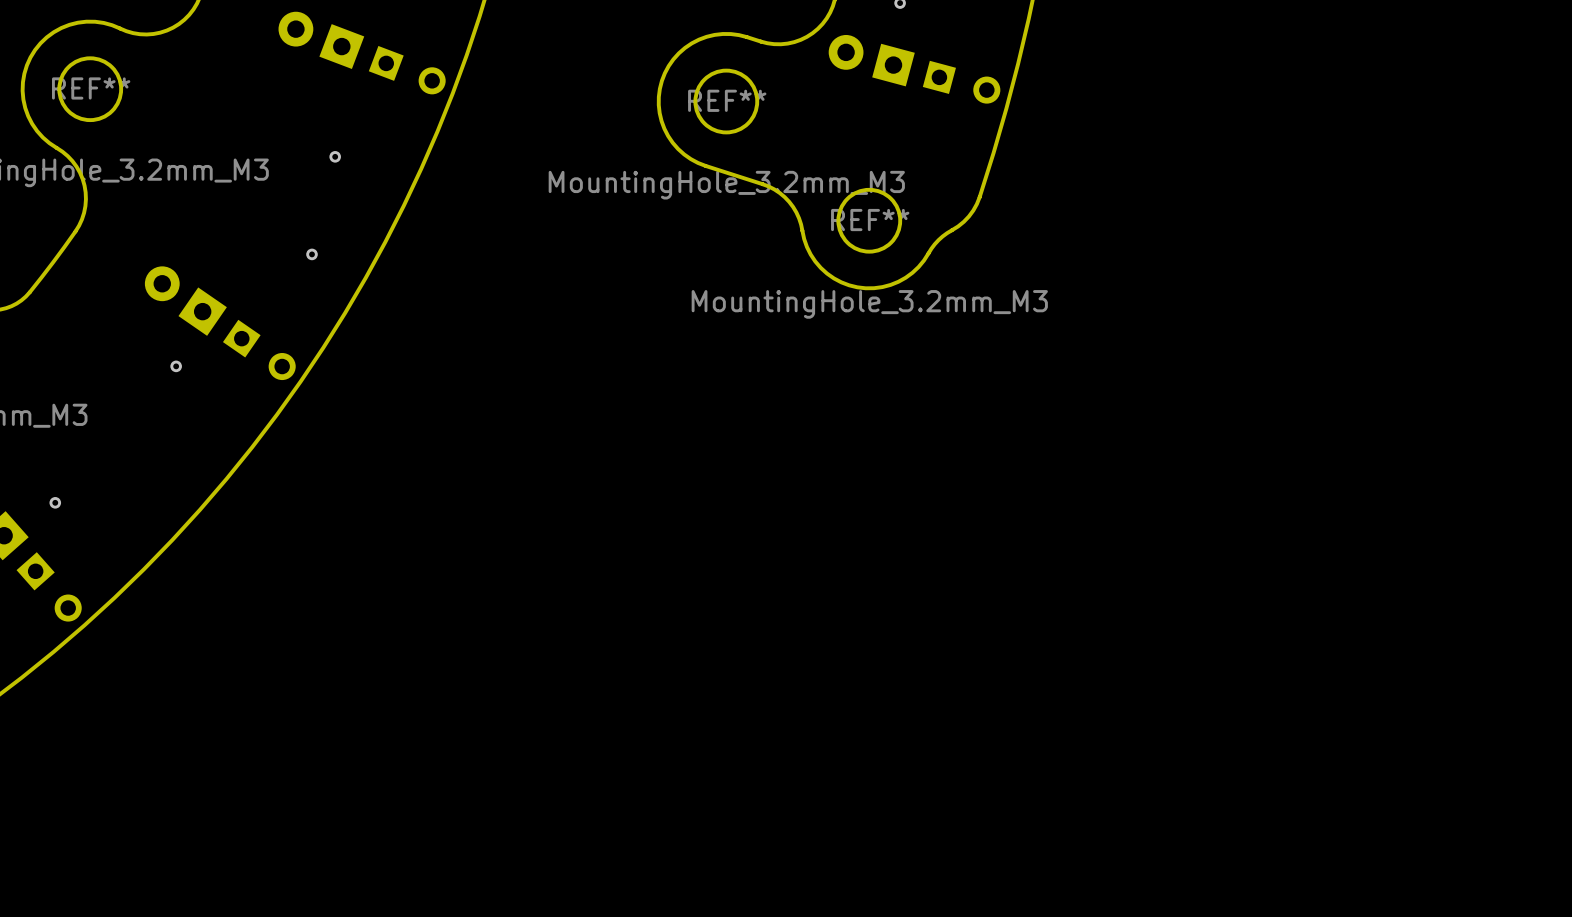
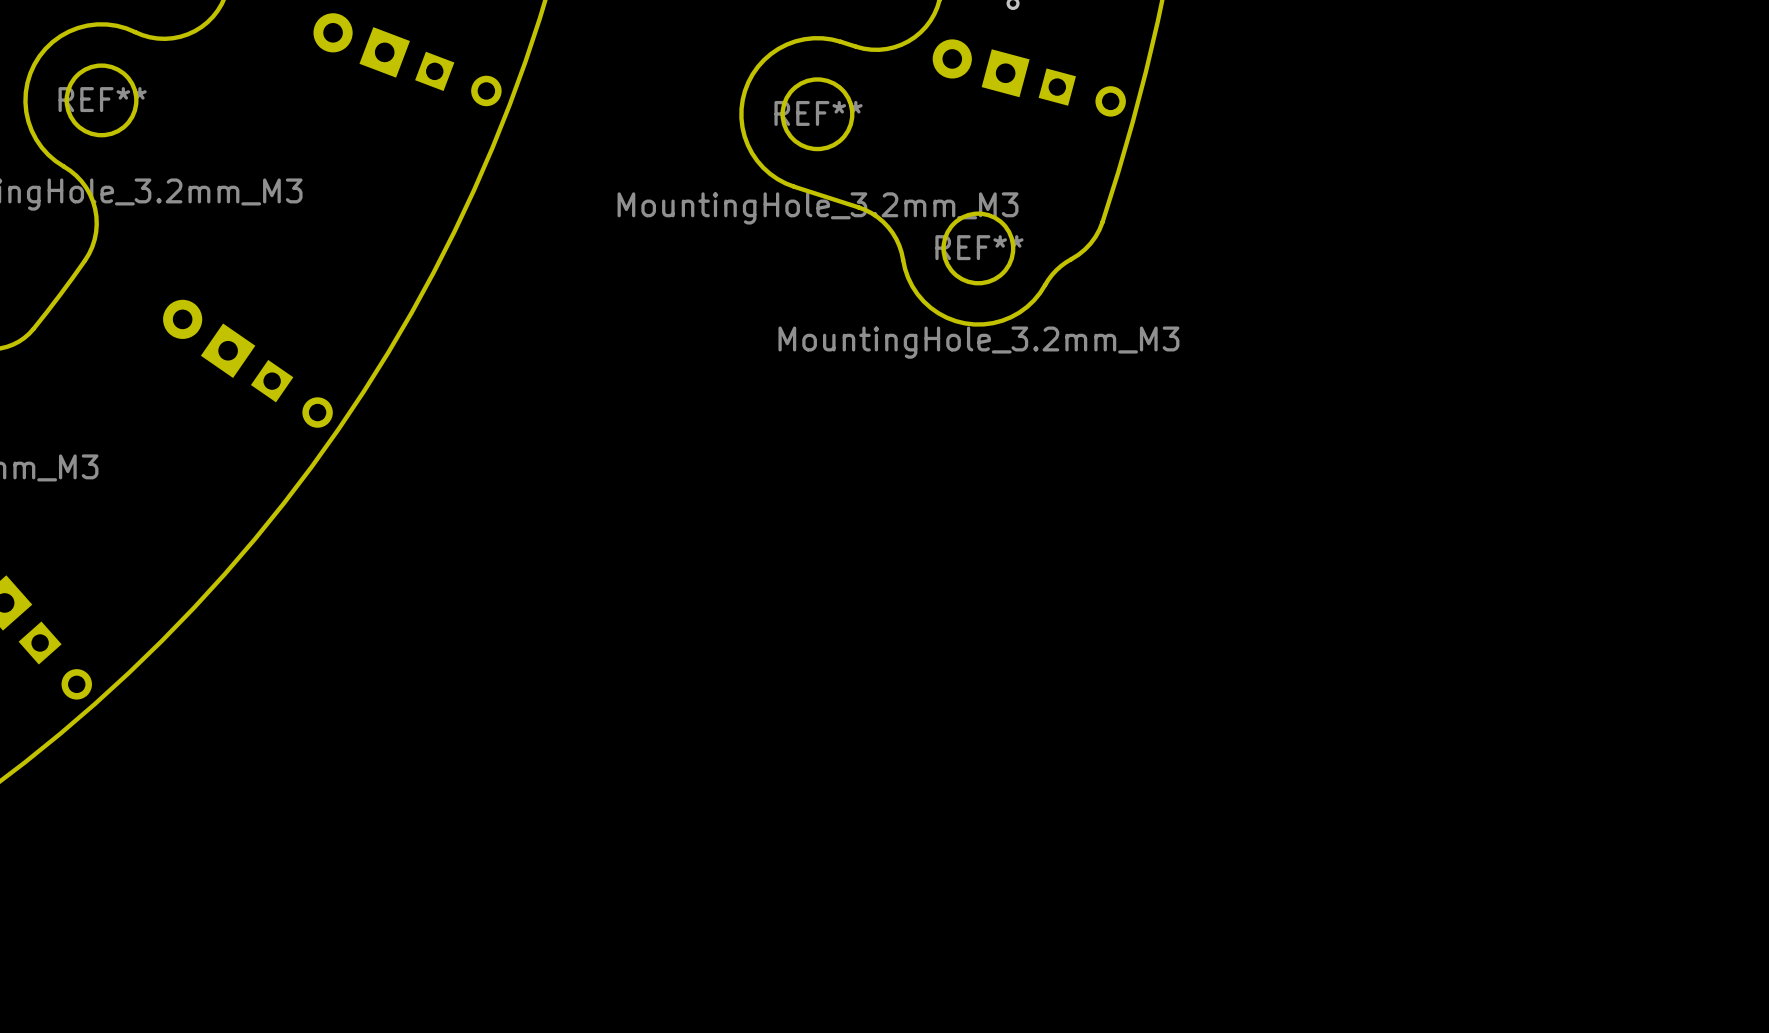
via: (335, 156) -> none
via: (312, 254) -> none
via: (176, 366) -> none
via: (55, 502) -> none

